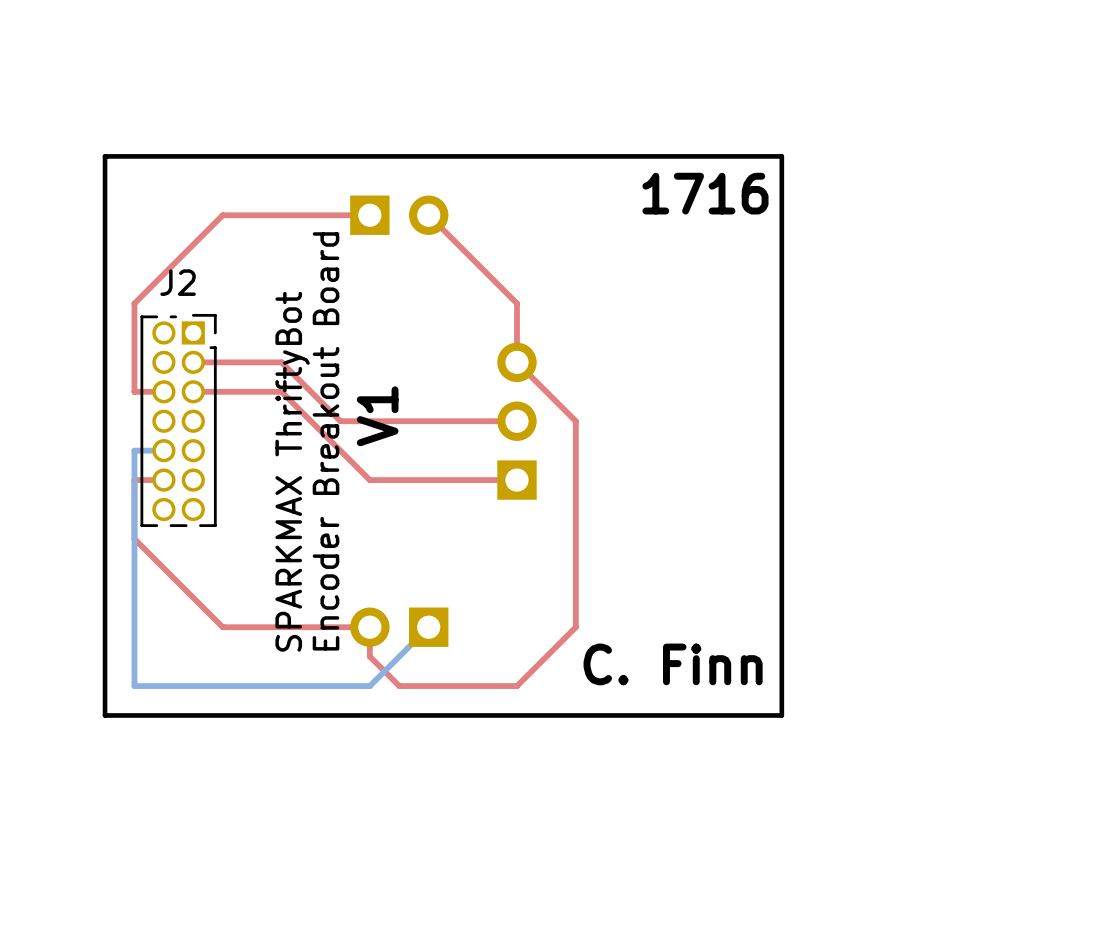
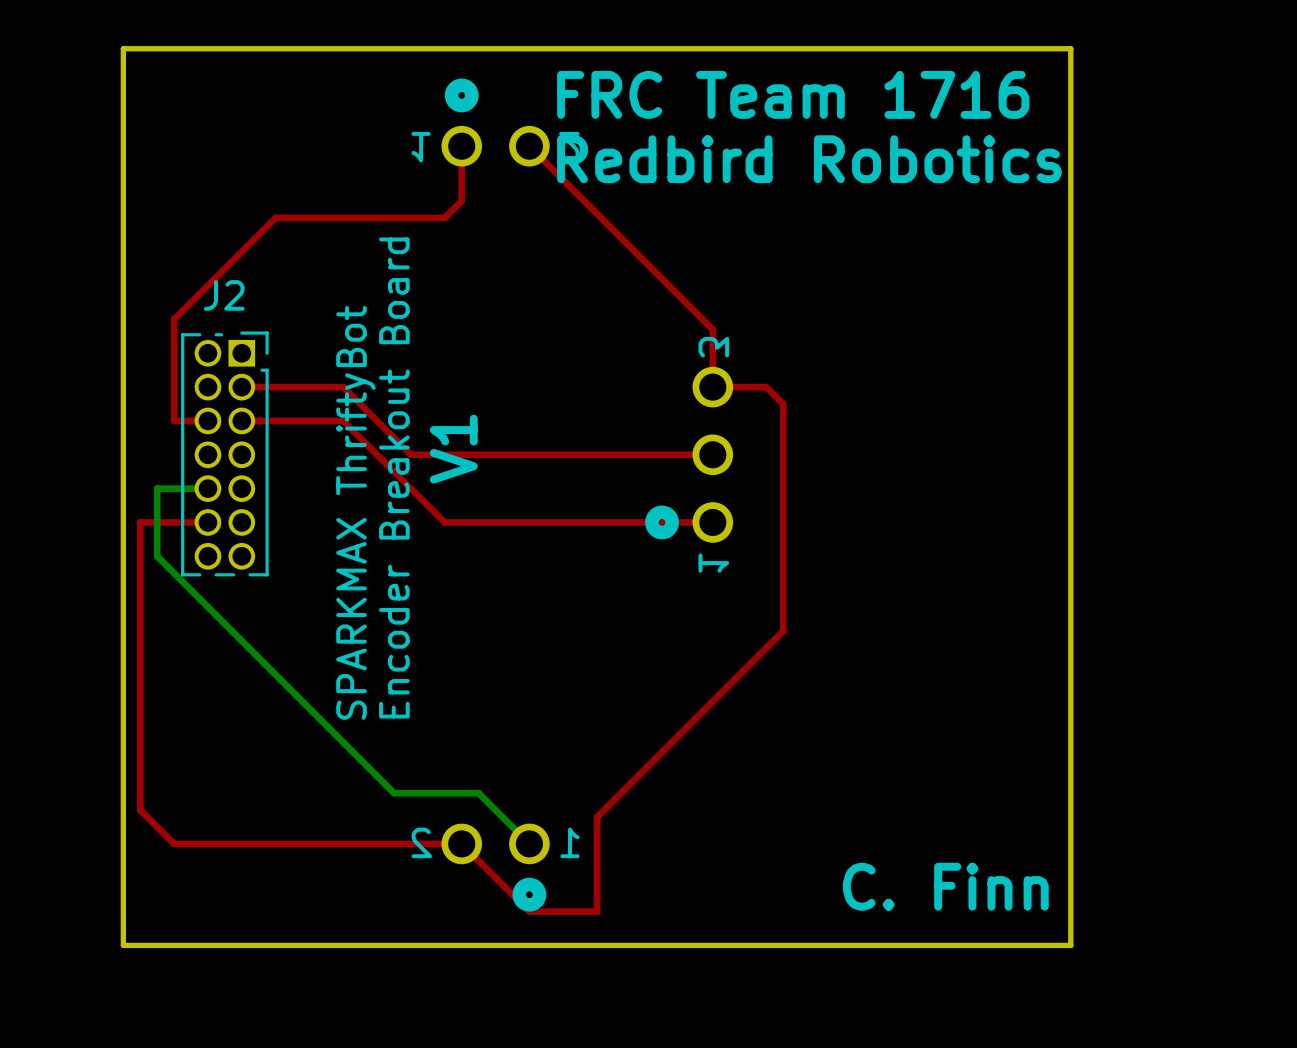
text: none -> FRC Team 1716 (793, 94)
part: none -> (495, 122)
top track: none -> (461, 146) (461, 201) (444, 217)
board edge: (781, 156) (105, 156) (105, 715) (781, 715) (781, 156) -> (1070, 48) (1070, 945) (123, 945) (123, 48) (1070, 48)
text: none -> Redbird Robotics (809, 159)
text: 1716 (705, 193) -> none
part: (399, 215) -> none
top track: (428, 215) (516, 303) (516, 362) (575, 421) (575, 627) (516, 686) (399, 686) (369, 656) (369, 627) (222, 627) (134, 538) (134, 480) -> (529, 146) (712, 329) (712, 387) (766, 387) (783, 404) (783, 631) (597, 817) (597, 911) (529, 911) (461, 843) (174, 843) (140, 810) (140, 522) (174, 522)
part: (516, 421) -> none
part: none -> (689, 454)
top track: none -> (712, 454) (614, 454)
bottom track: (134, 450) (134, 686) (369, 686) (428, 627) -> (174, 488) (157, 488) (157, 556) (394, 793) (478, 793) (529, 843)
top track: none -> (712, 522) (614, 522)
part: (399, 627) -> none
text position: C. Finn (673, 664) -> C. Finn (945, 886)
part: none -> (495, 867)

